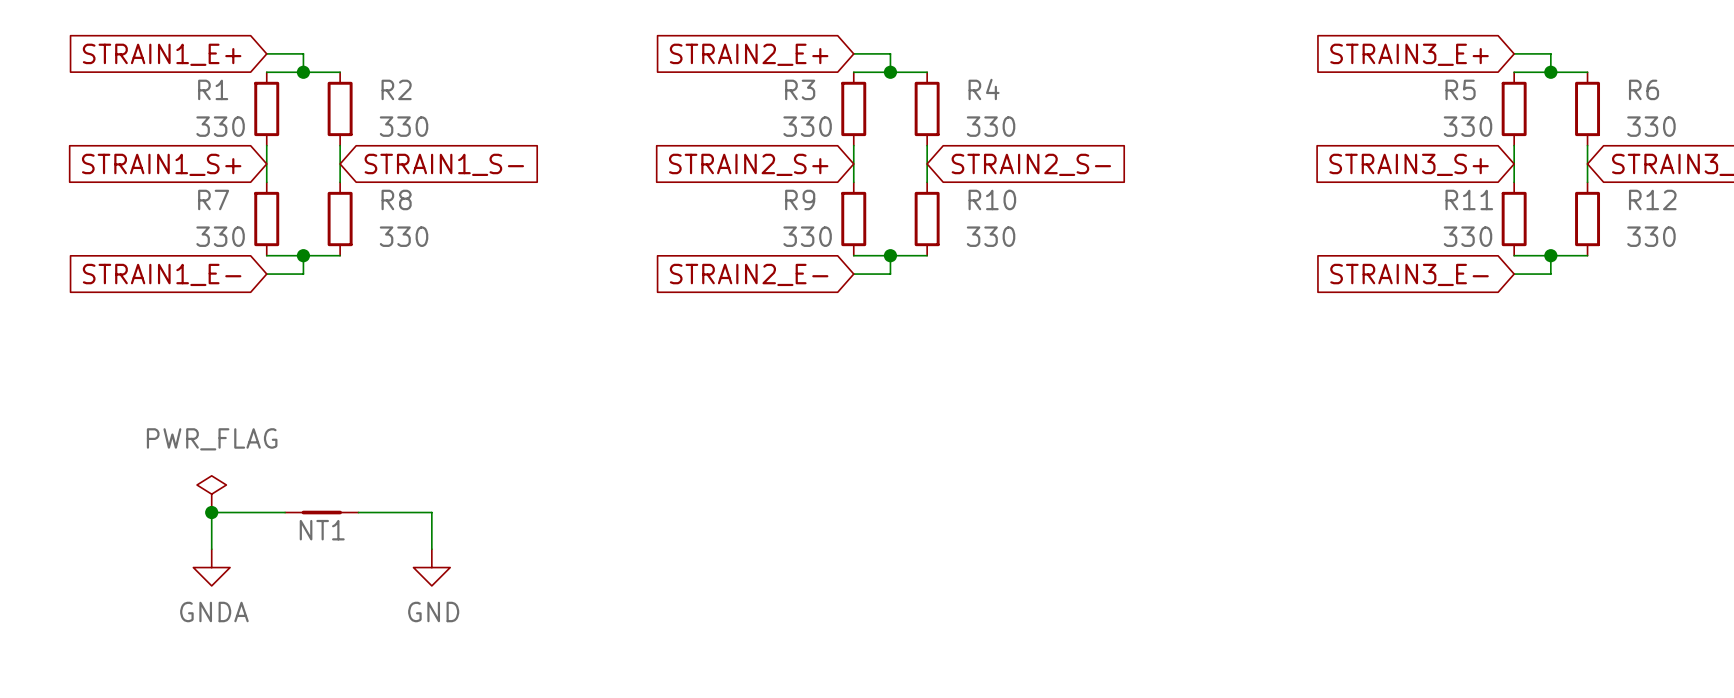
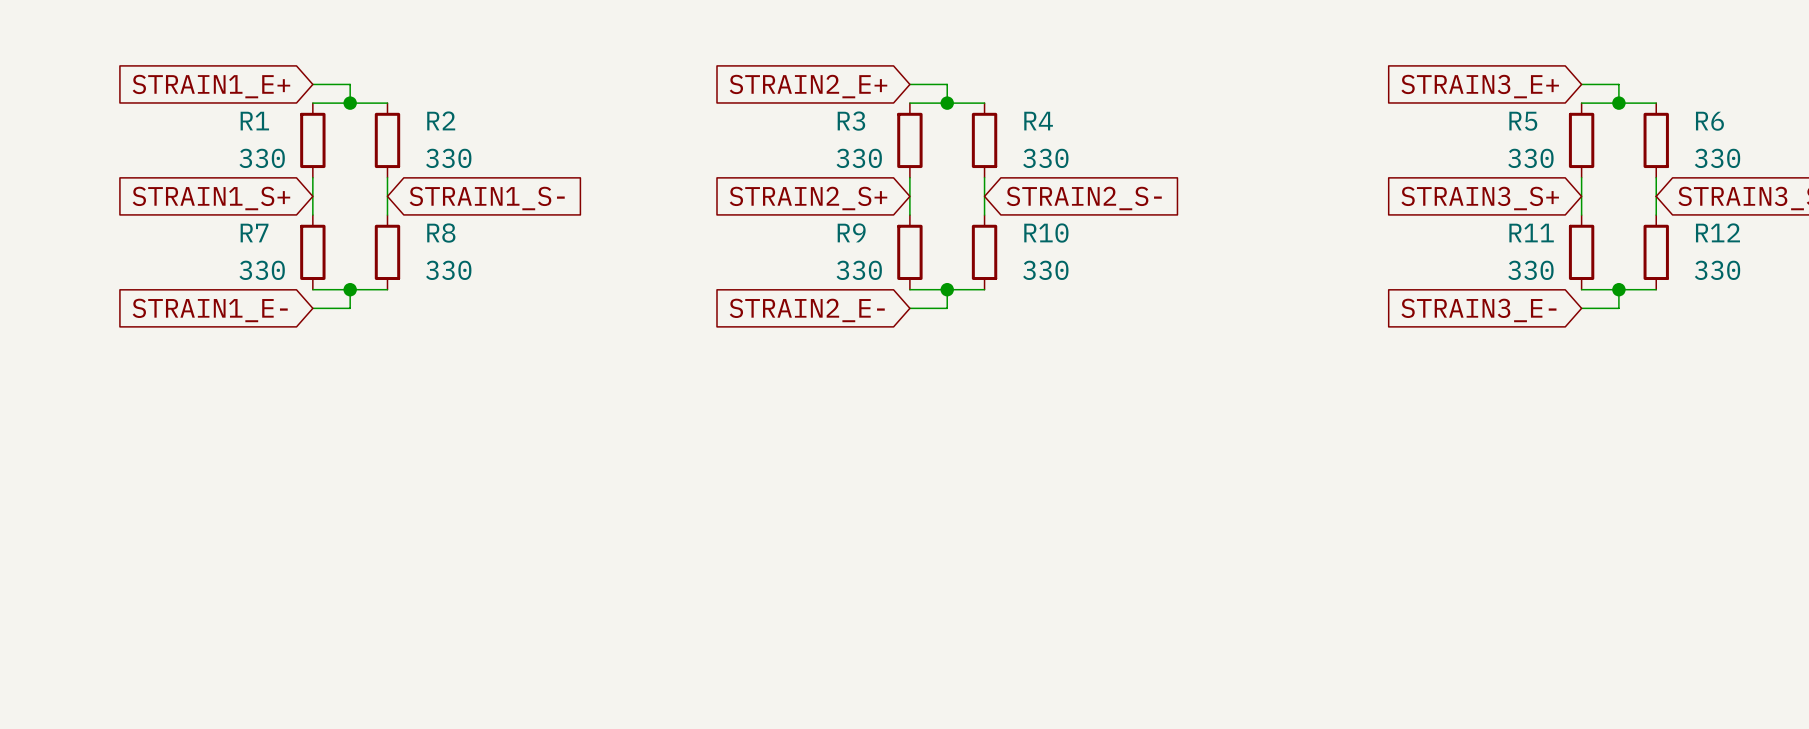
power symbol: PWR_FLAG (211, 494) -> none
junction: (211, 512) -> none
wire: (285, 512) (211, 512) (211, 549) -> none
NT1: (321, 512) -> none
wire: (358, 512) (431, 512) (431, 549) -> none
power symbol: GNDA (211, 567) -> none
power symbol: GND (431, 567) -> none

